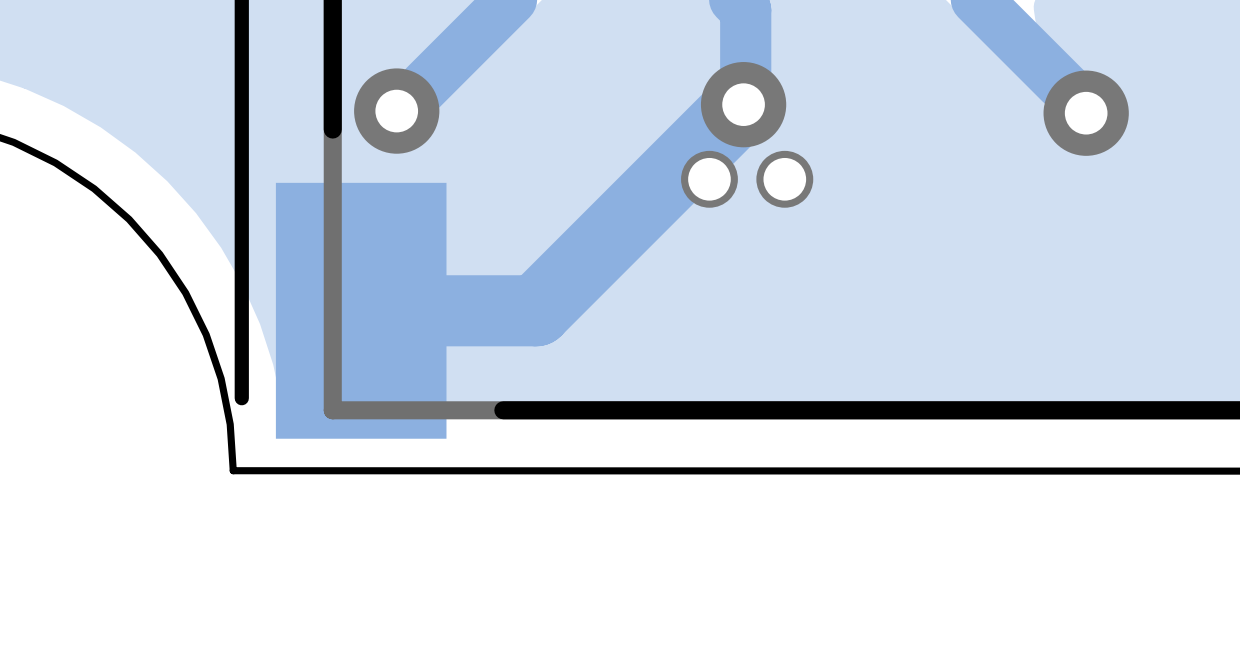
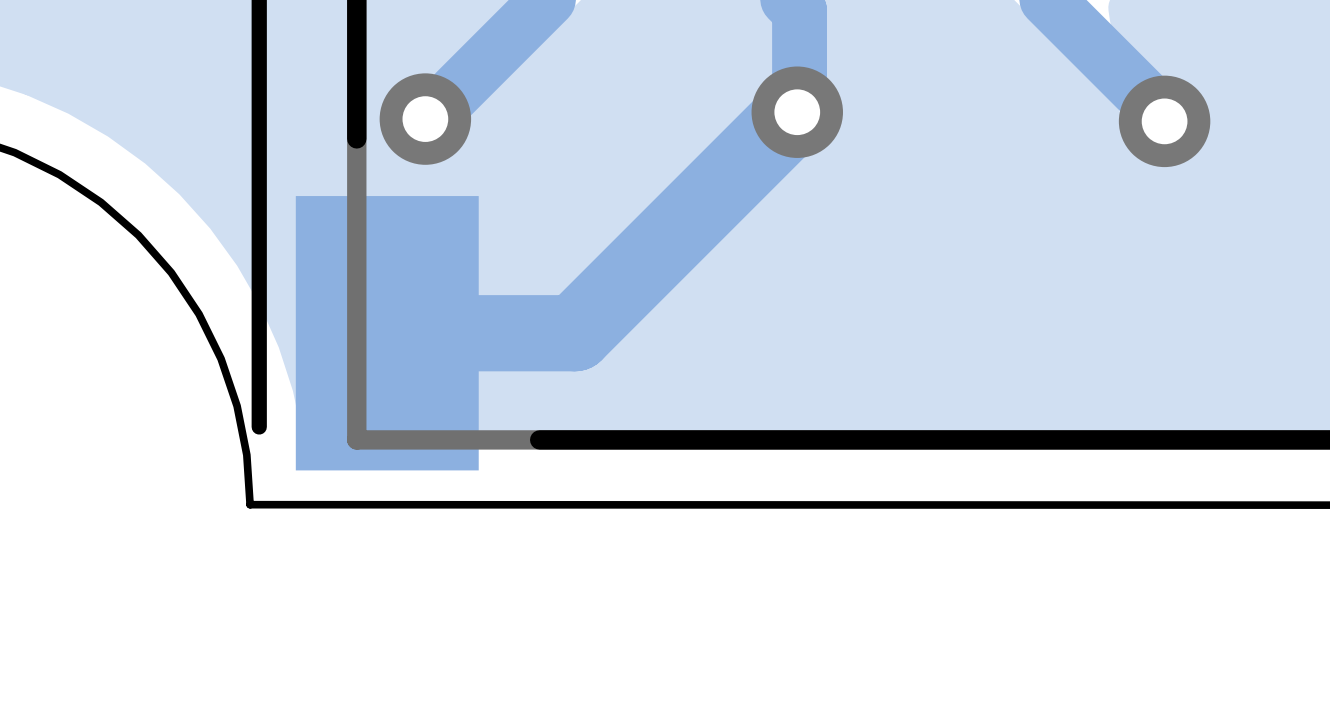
via: (709, 179) -> none
via: (784, 179) -> none

